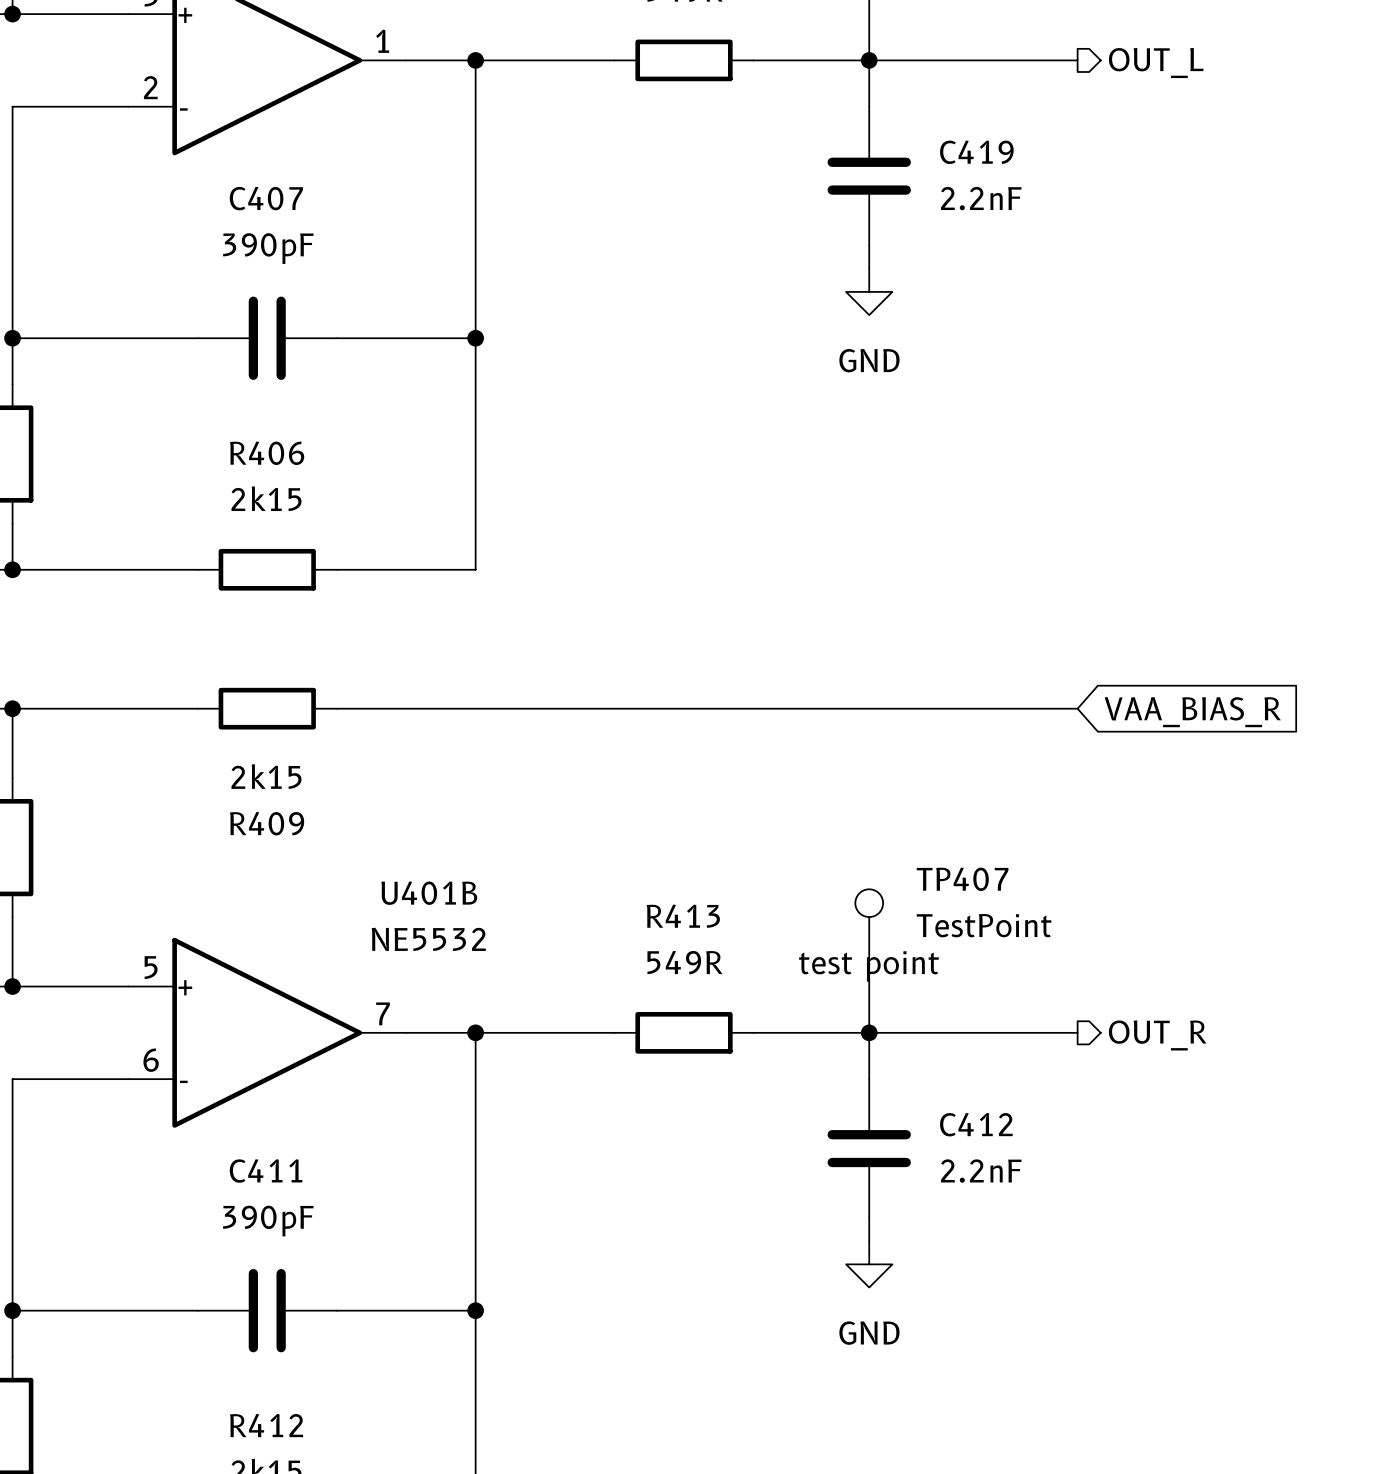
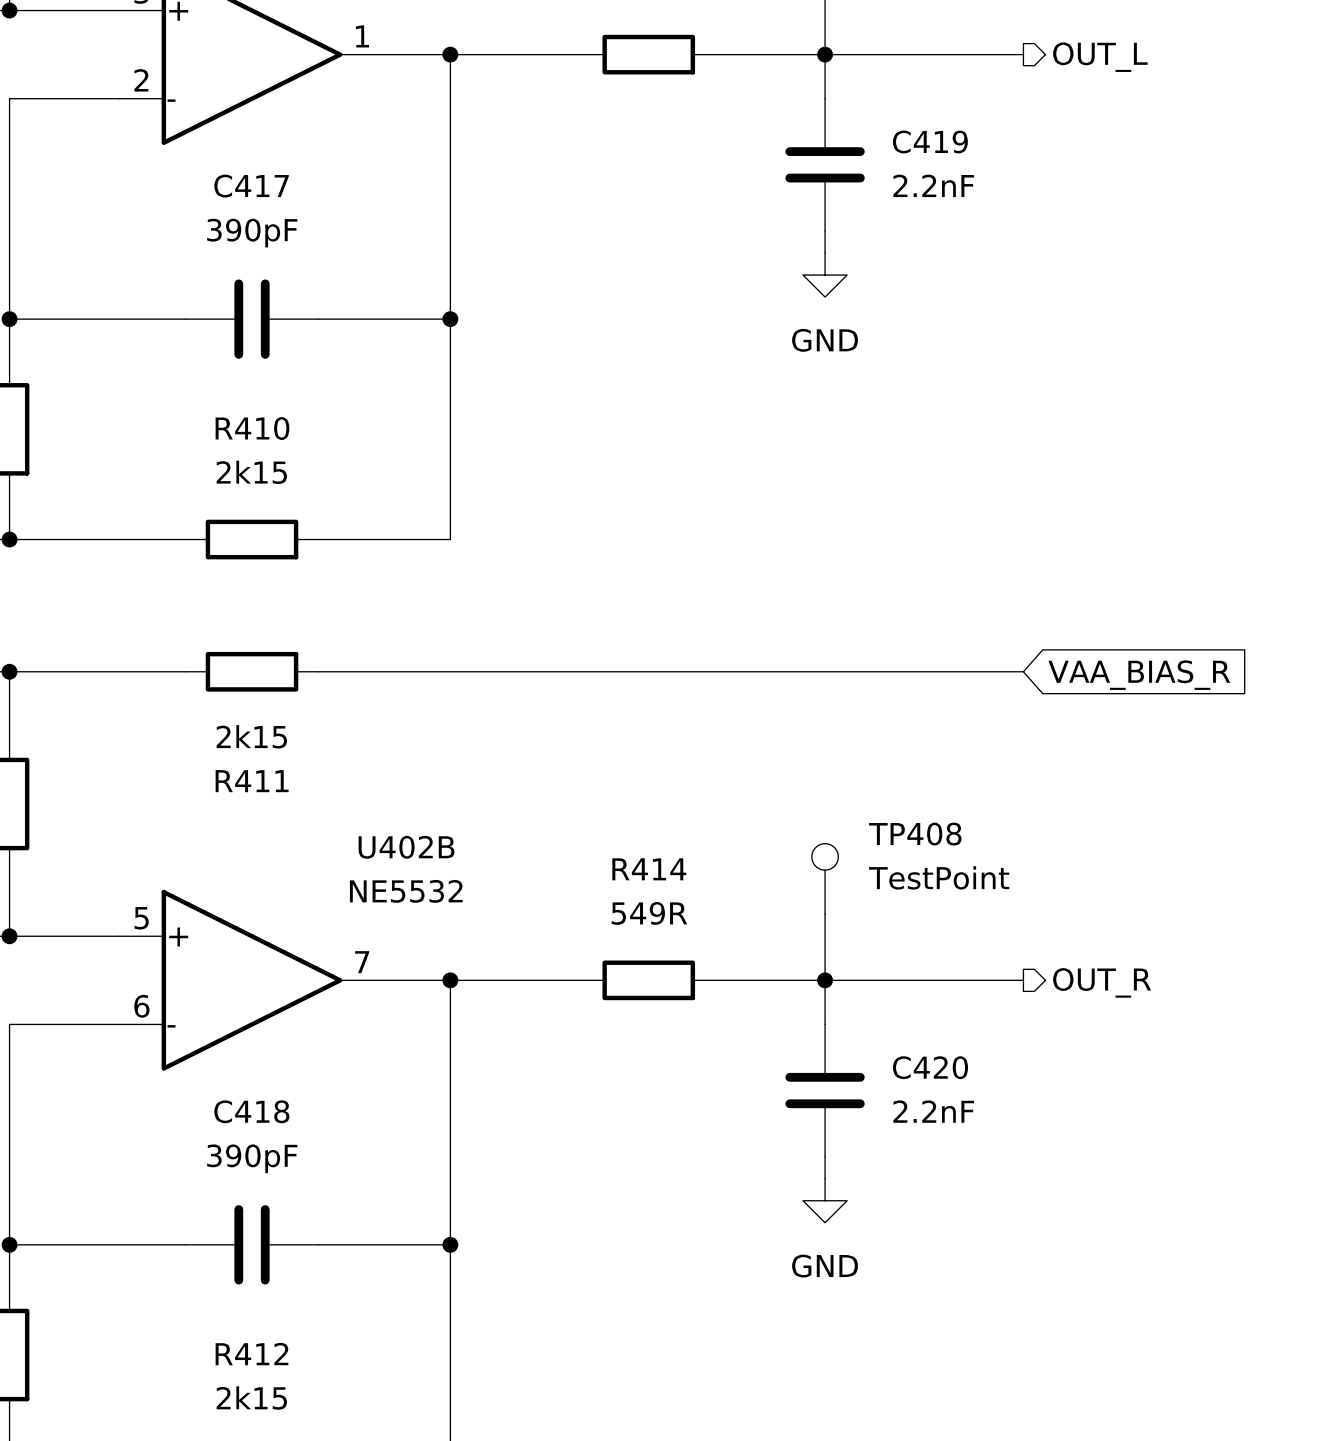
C407 name: C407 (266, 198) -> C417 (251, 186)
R406 name: R406 (267, 453) -> R410 (252, 428)
R409 name: R409 (267, 823) -> R411 (252, 781)
TP407 name: TP407 (962, 879) -> TP408 (915, 834)
U401B name: U401B (429, 893) -> U402B (406, 847)
R413 name: R413 (683, 916) -> R414 (649, 869)
TP407 text: test point (869, 966) -> none
C412 name: C412 (976, 1124) -> C420 (930, 1067)
C411 name: C411 (266, 1171) -> C418 (251, 1111)

